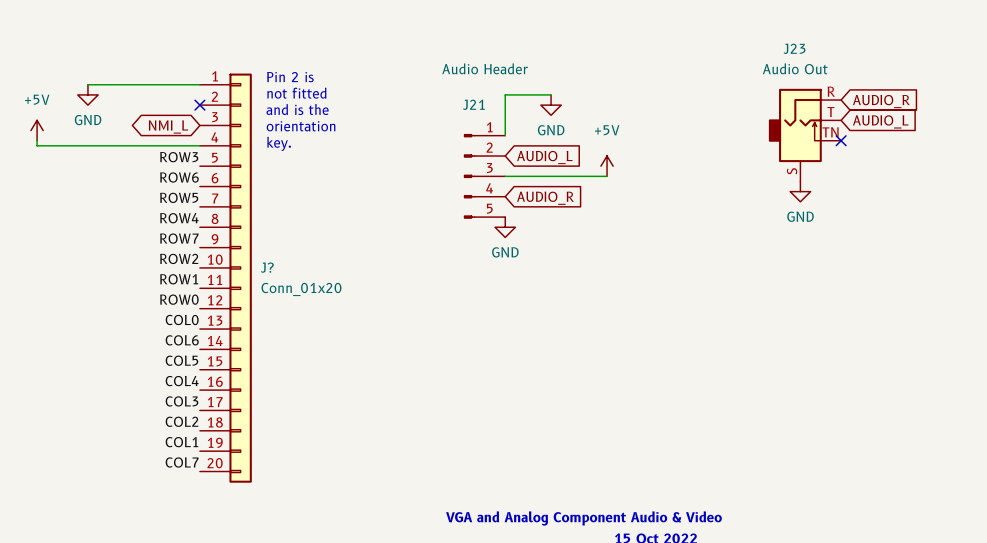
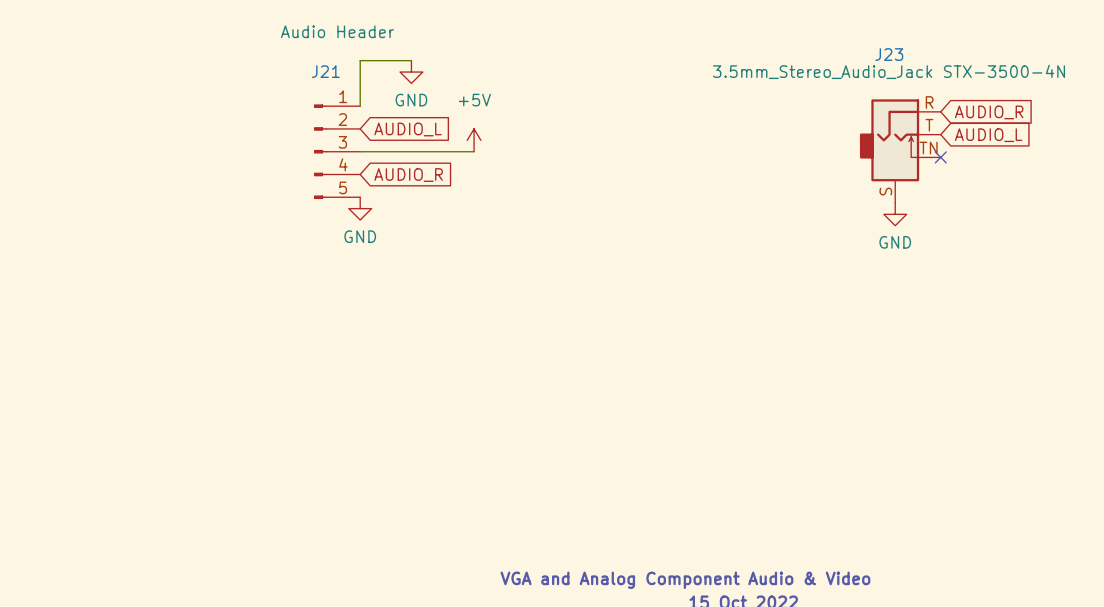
power symbol: none -> GND (411, 72)
J23 value: Audio Out (795, 68) -> 3.5mm_Stereo_Audio_Jack STX-3500-4N (889, 71)
text: Pin 2 is (290, 77) -> none
wire: (87, 84) (199, 84) -> none
text: not fitted (296, 93) -> none
power symbol: GND (87, 94) -> none
wire: (551, 94) (505, 94) (505, 135) -> (411, 60) (360, 60) (360, 106)
no-connect mark: (199, 105) -> none
power symbol: GND (551, 105) -> none
text: and is the (297, 109) -> none
global label: NMI_L (168, 126) -> none
text: orientation (301, 126) -> none
power symbol: +5V (37, 130) -> none
wire: (37, 140) (37, 145) (199, 145) -> none
text: key. (279, 143) -> none
label: ROW3 (179, 157) -> none
global label position: AUDIO_L (544, 157) -> AUDIO_L (408, 129)
power symbol position: +5V (607, 166) -> +5V (474, 140)
J21 position: (484, 176) -> (337, 151)
wire: (505, 176) (607, 176) -> (360, 151) (474, 151)
label: ROW6 (179, 177) -> none
power symbol: none -> GND (360, 208)
label: ROW5 (179, 197) -> none
global label position: AUDIO_R (545, 198) -> AUDIO_R (408, 175)
label: ROW4 (179, 218) -> none
power symbol: GND (505, 227) -> none
label: ROW7 (179, 238) -> none
label: ROW2 (179, 258) -> none
J?: Conn_01x20 (225, 278) -> none
label: ROW1 (179, 279) -> none
label: ROW0 (179, 299) -> none
label: COL0 (182, 320) -> none
label: COL6 (182, 340) -> none
label: COL5 (181, 360) -> none
label: COL4 (182, 381) -> none
label: COL3 (182, 401) -> none
label: COL2 (181, 421) -> none
label: COL1 (181, 442) -> none
label: COL7 (182, 462) -> none

